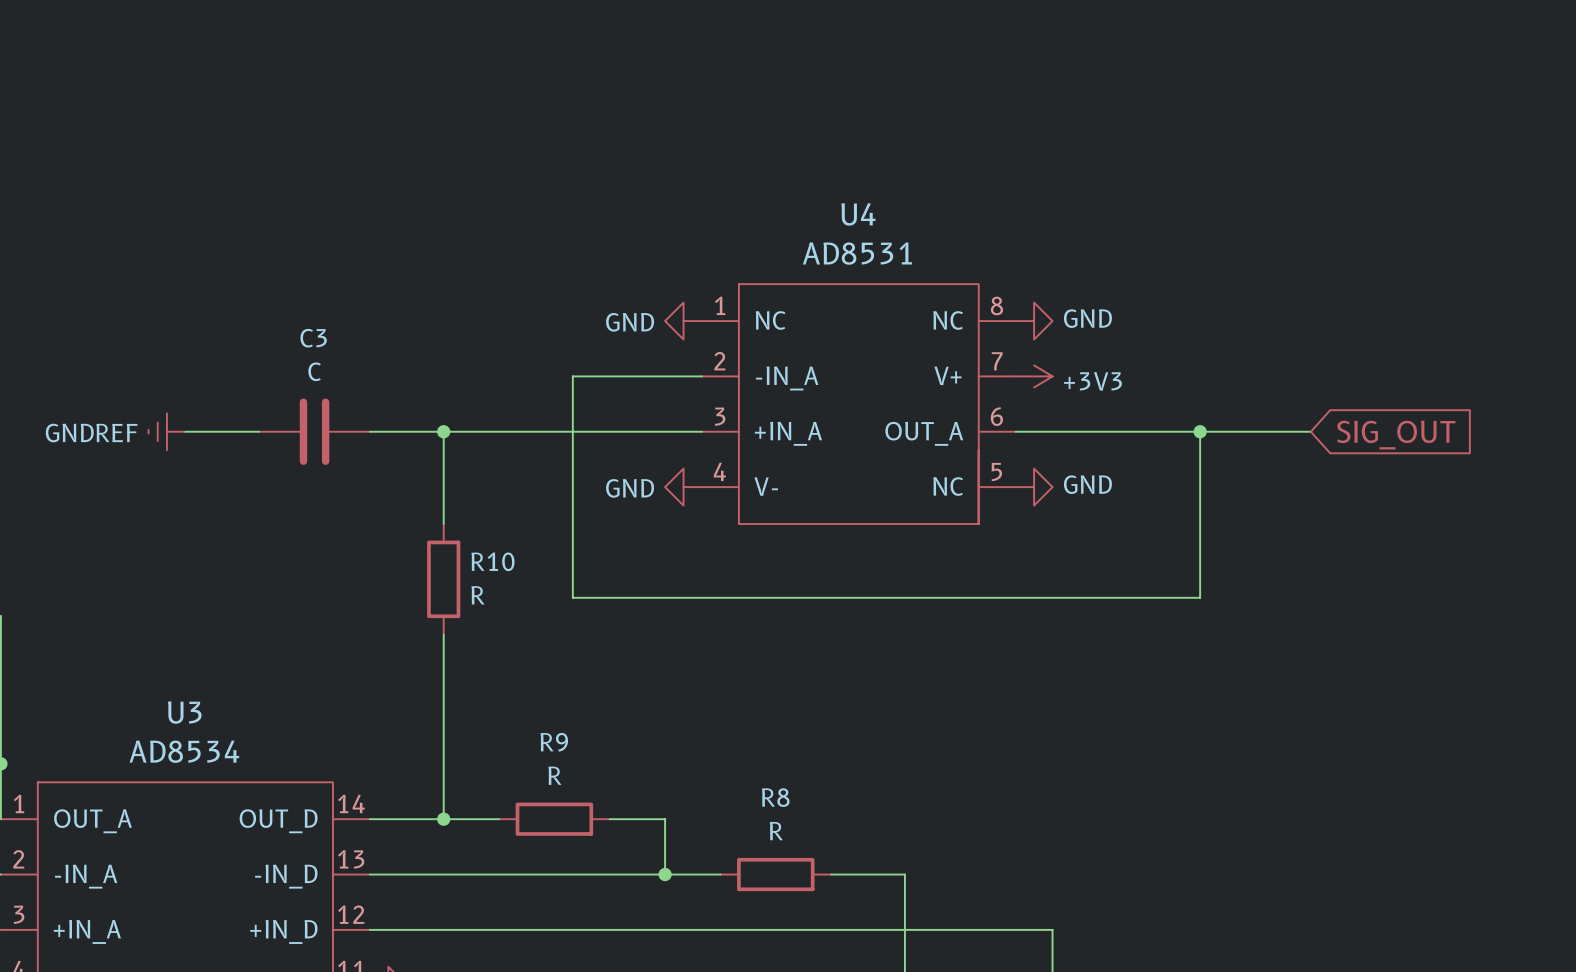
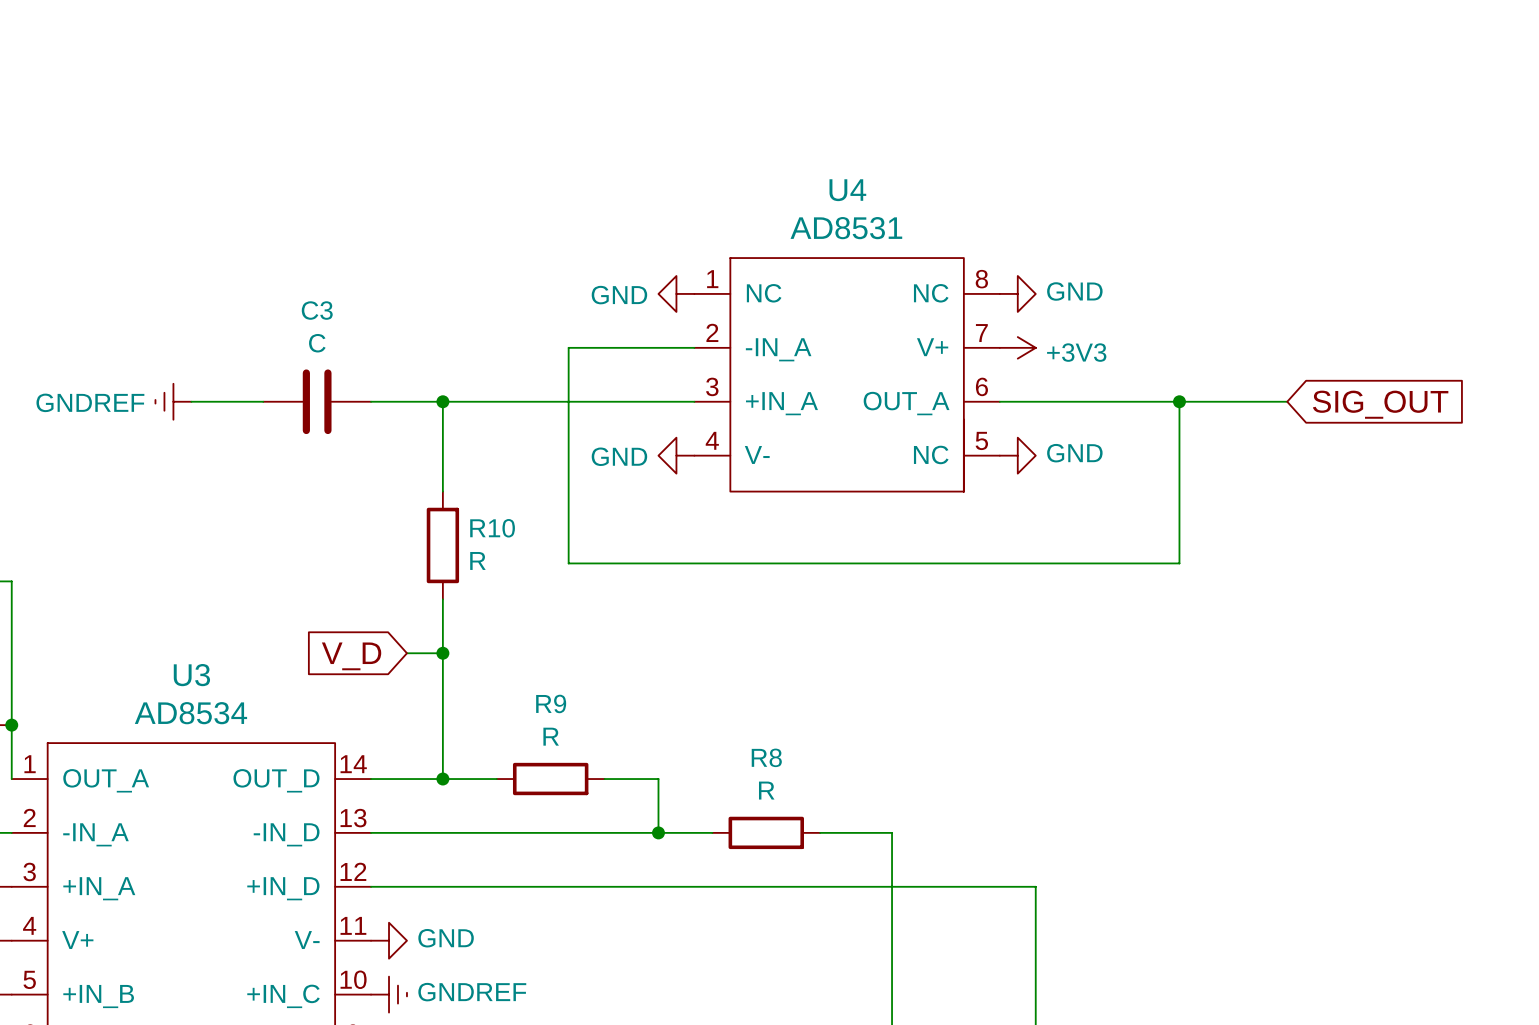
wire: none -> (406, 653) (442, 653)
junction: none -> (442, 653)
global label: none -> V_D (351, 656)

